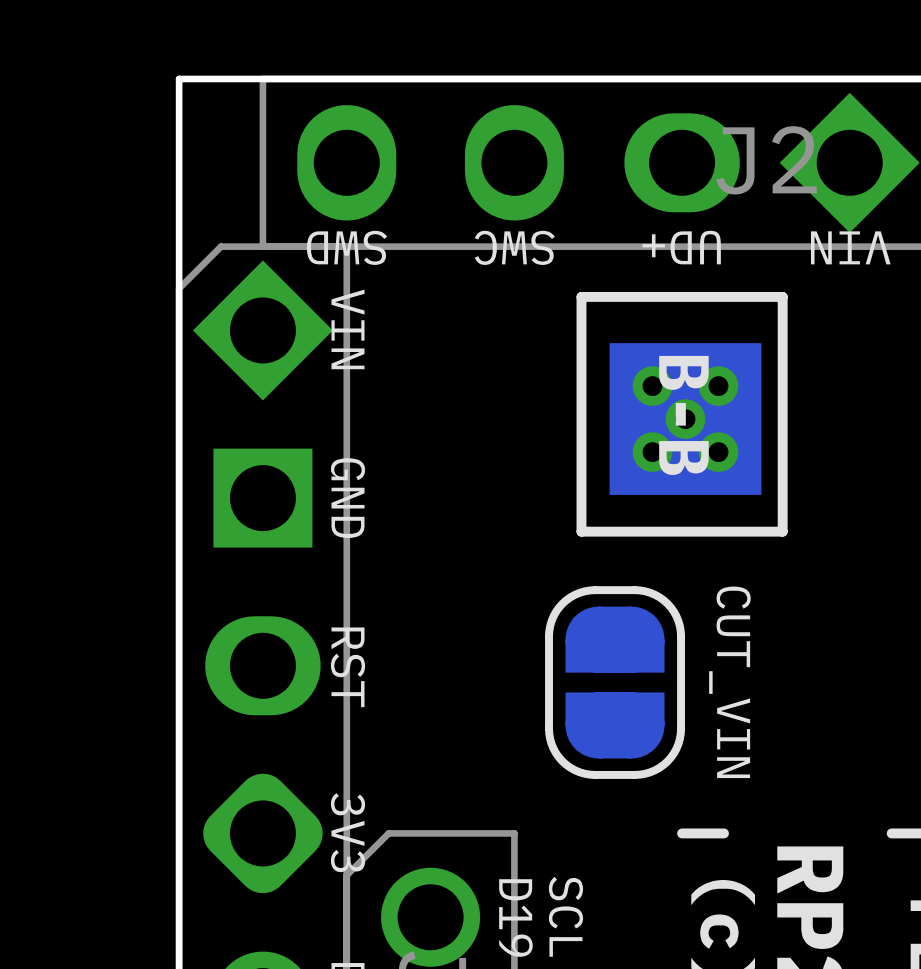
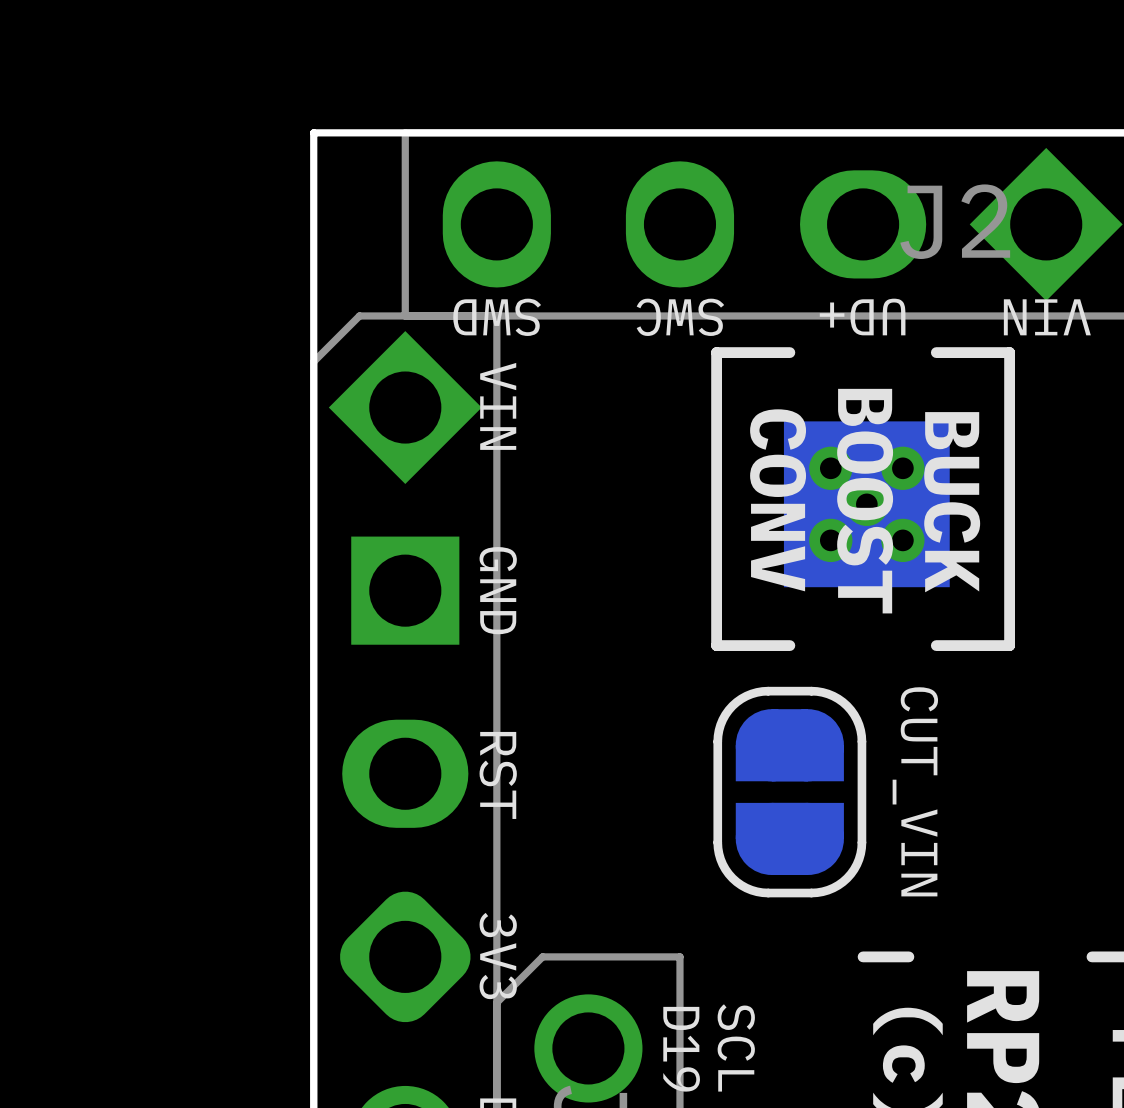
line: none -> (789, 352) (716, 352) (716, 645) (789, 645)
line: none -> (936, 352) (1009, 352) (1009, 645) (936, 645)
line: (782, 296) (581, 296) (581, 531) (782, 531) (782, 296) -> none
text: none -> CONV (778, 500)
text: B-B (683, 415) -> BOOST (865, 501)
text: none -> BUCK (952, 502)

